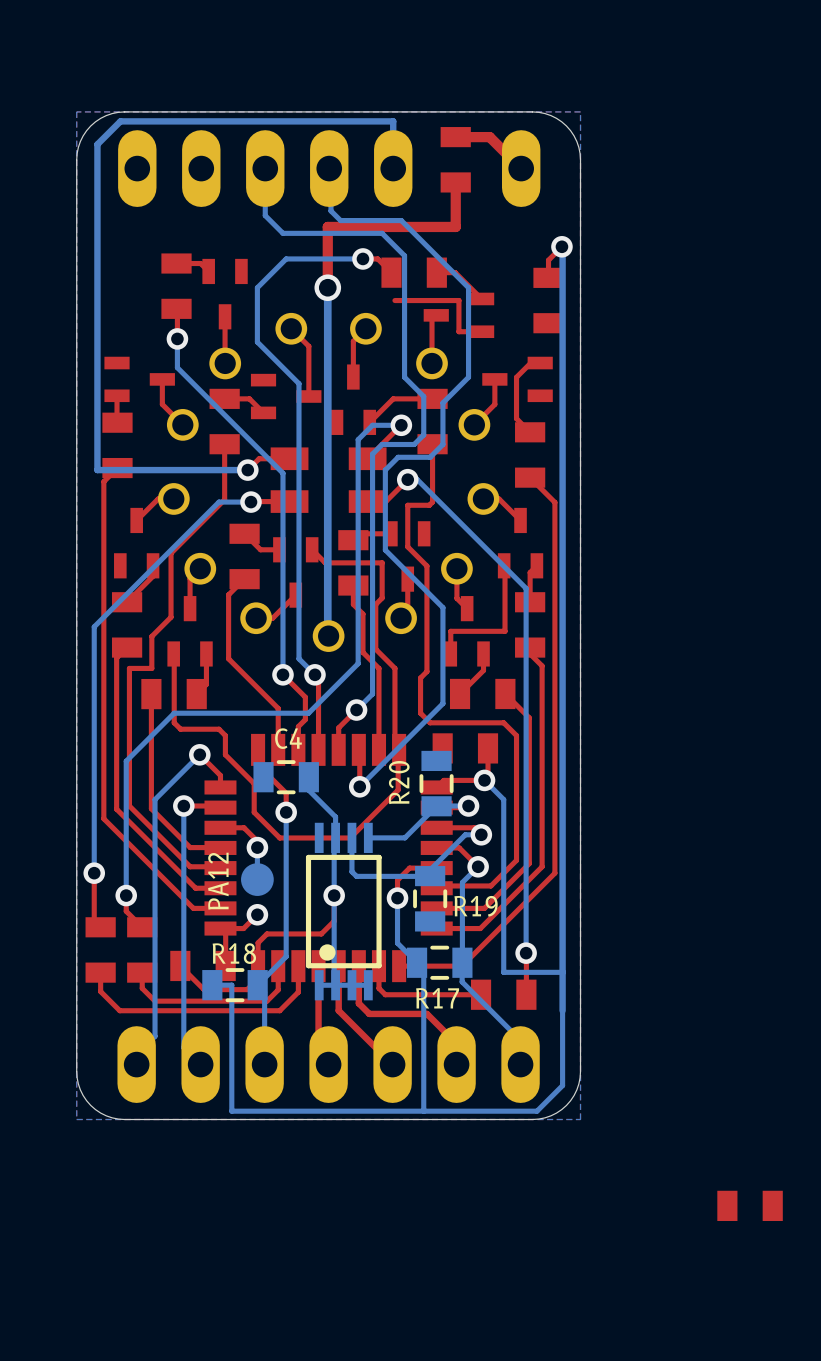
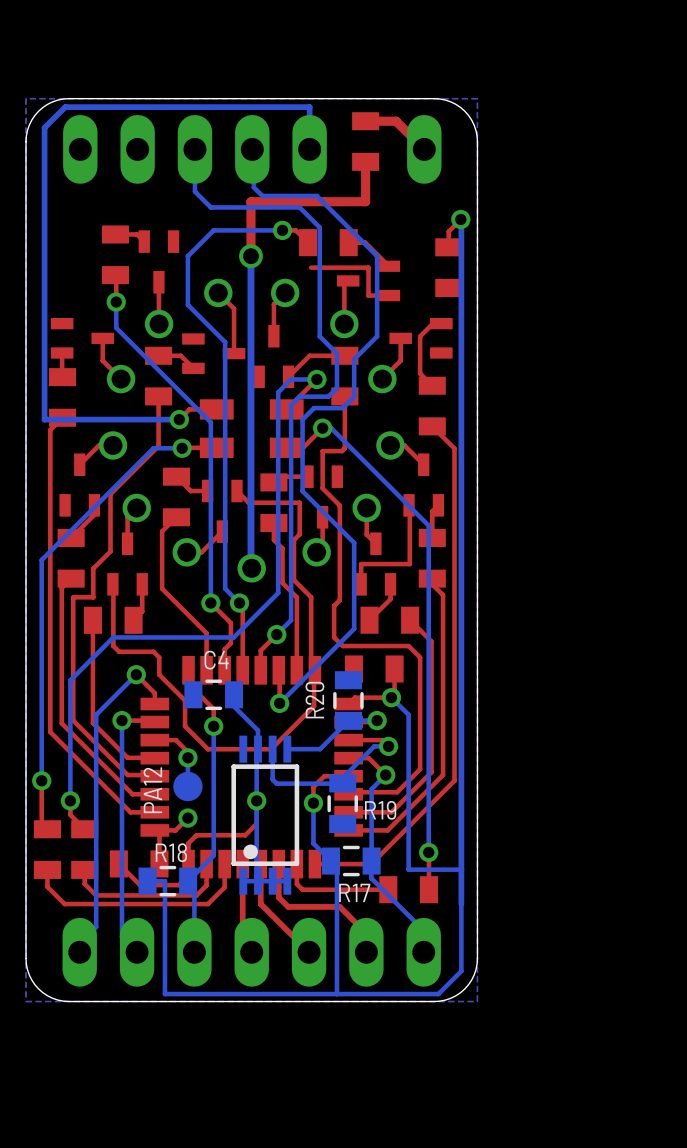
part: (750, 1205) -> none

